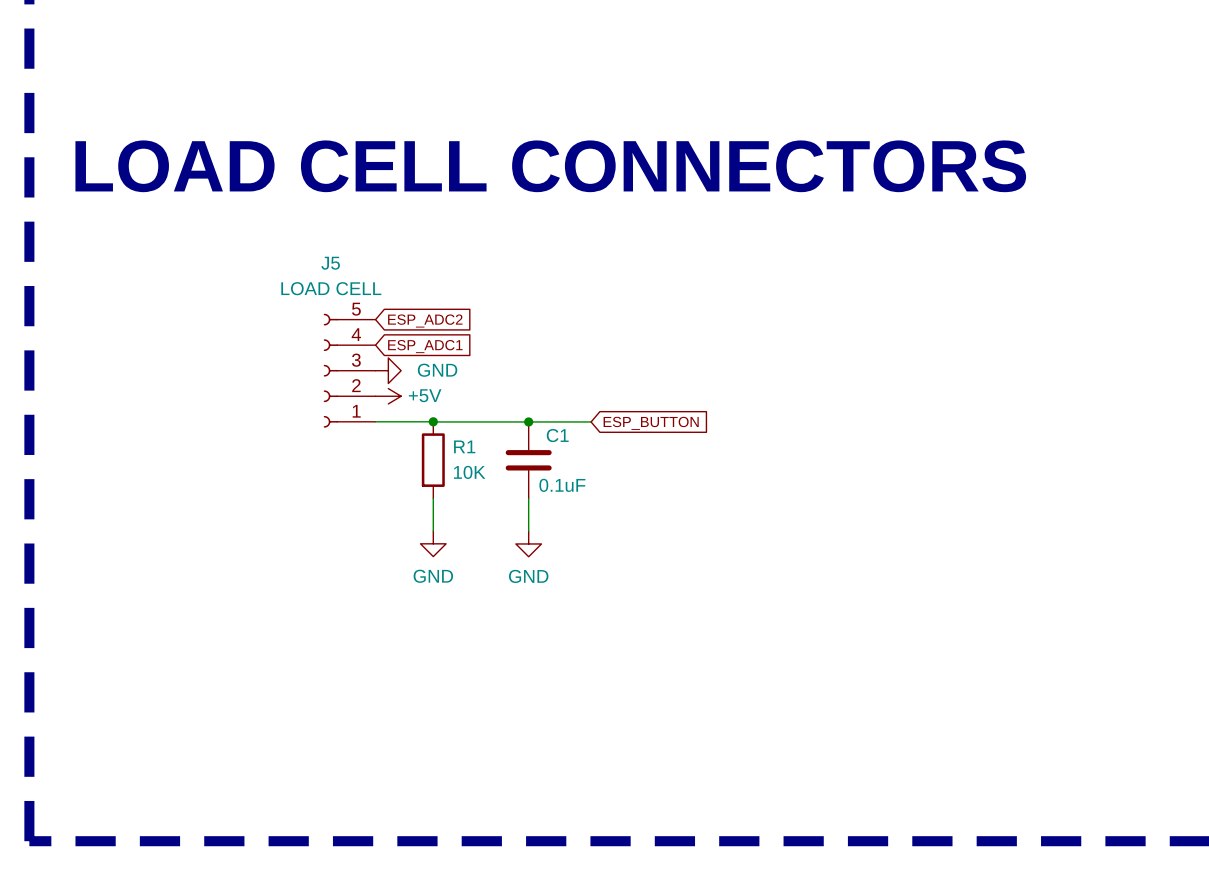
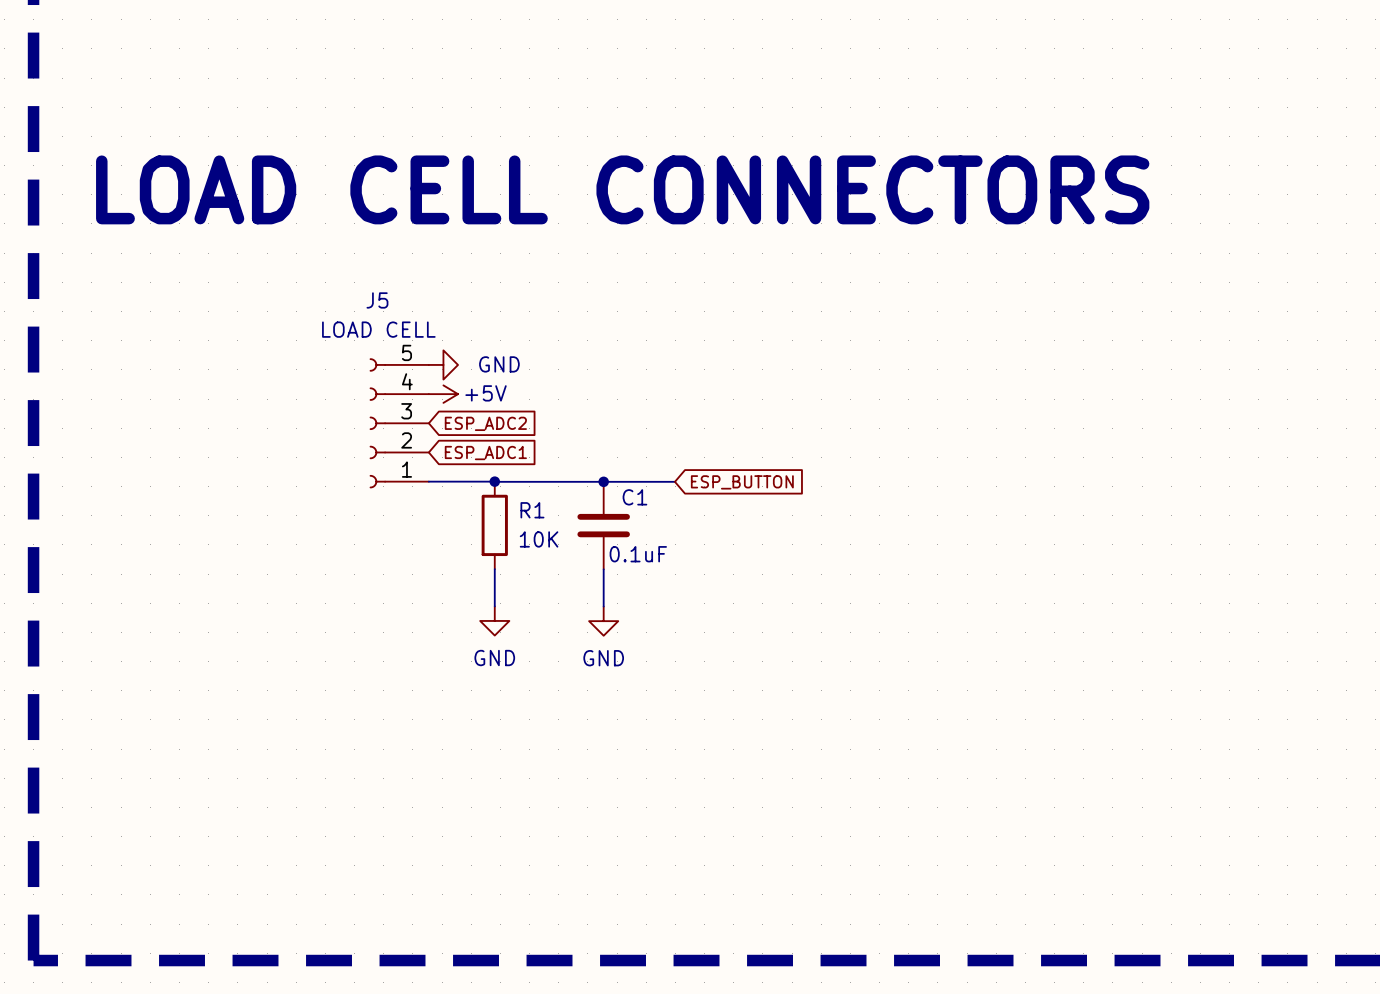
global label position: ESP_ADC2 (425, 321) -> ESP_ADC2 (485, 423)
global label position: ESP_ADC1 (425, 346) -> ESP_ADC1 (485, 453)
power symbol position: GND (388, 370) -> GND (443, 364)
power symbol position: +5V (388, 396) -> +5V (443, 394)

